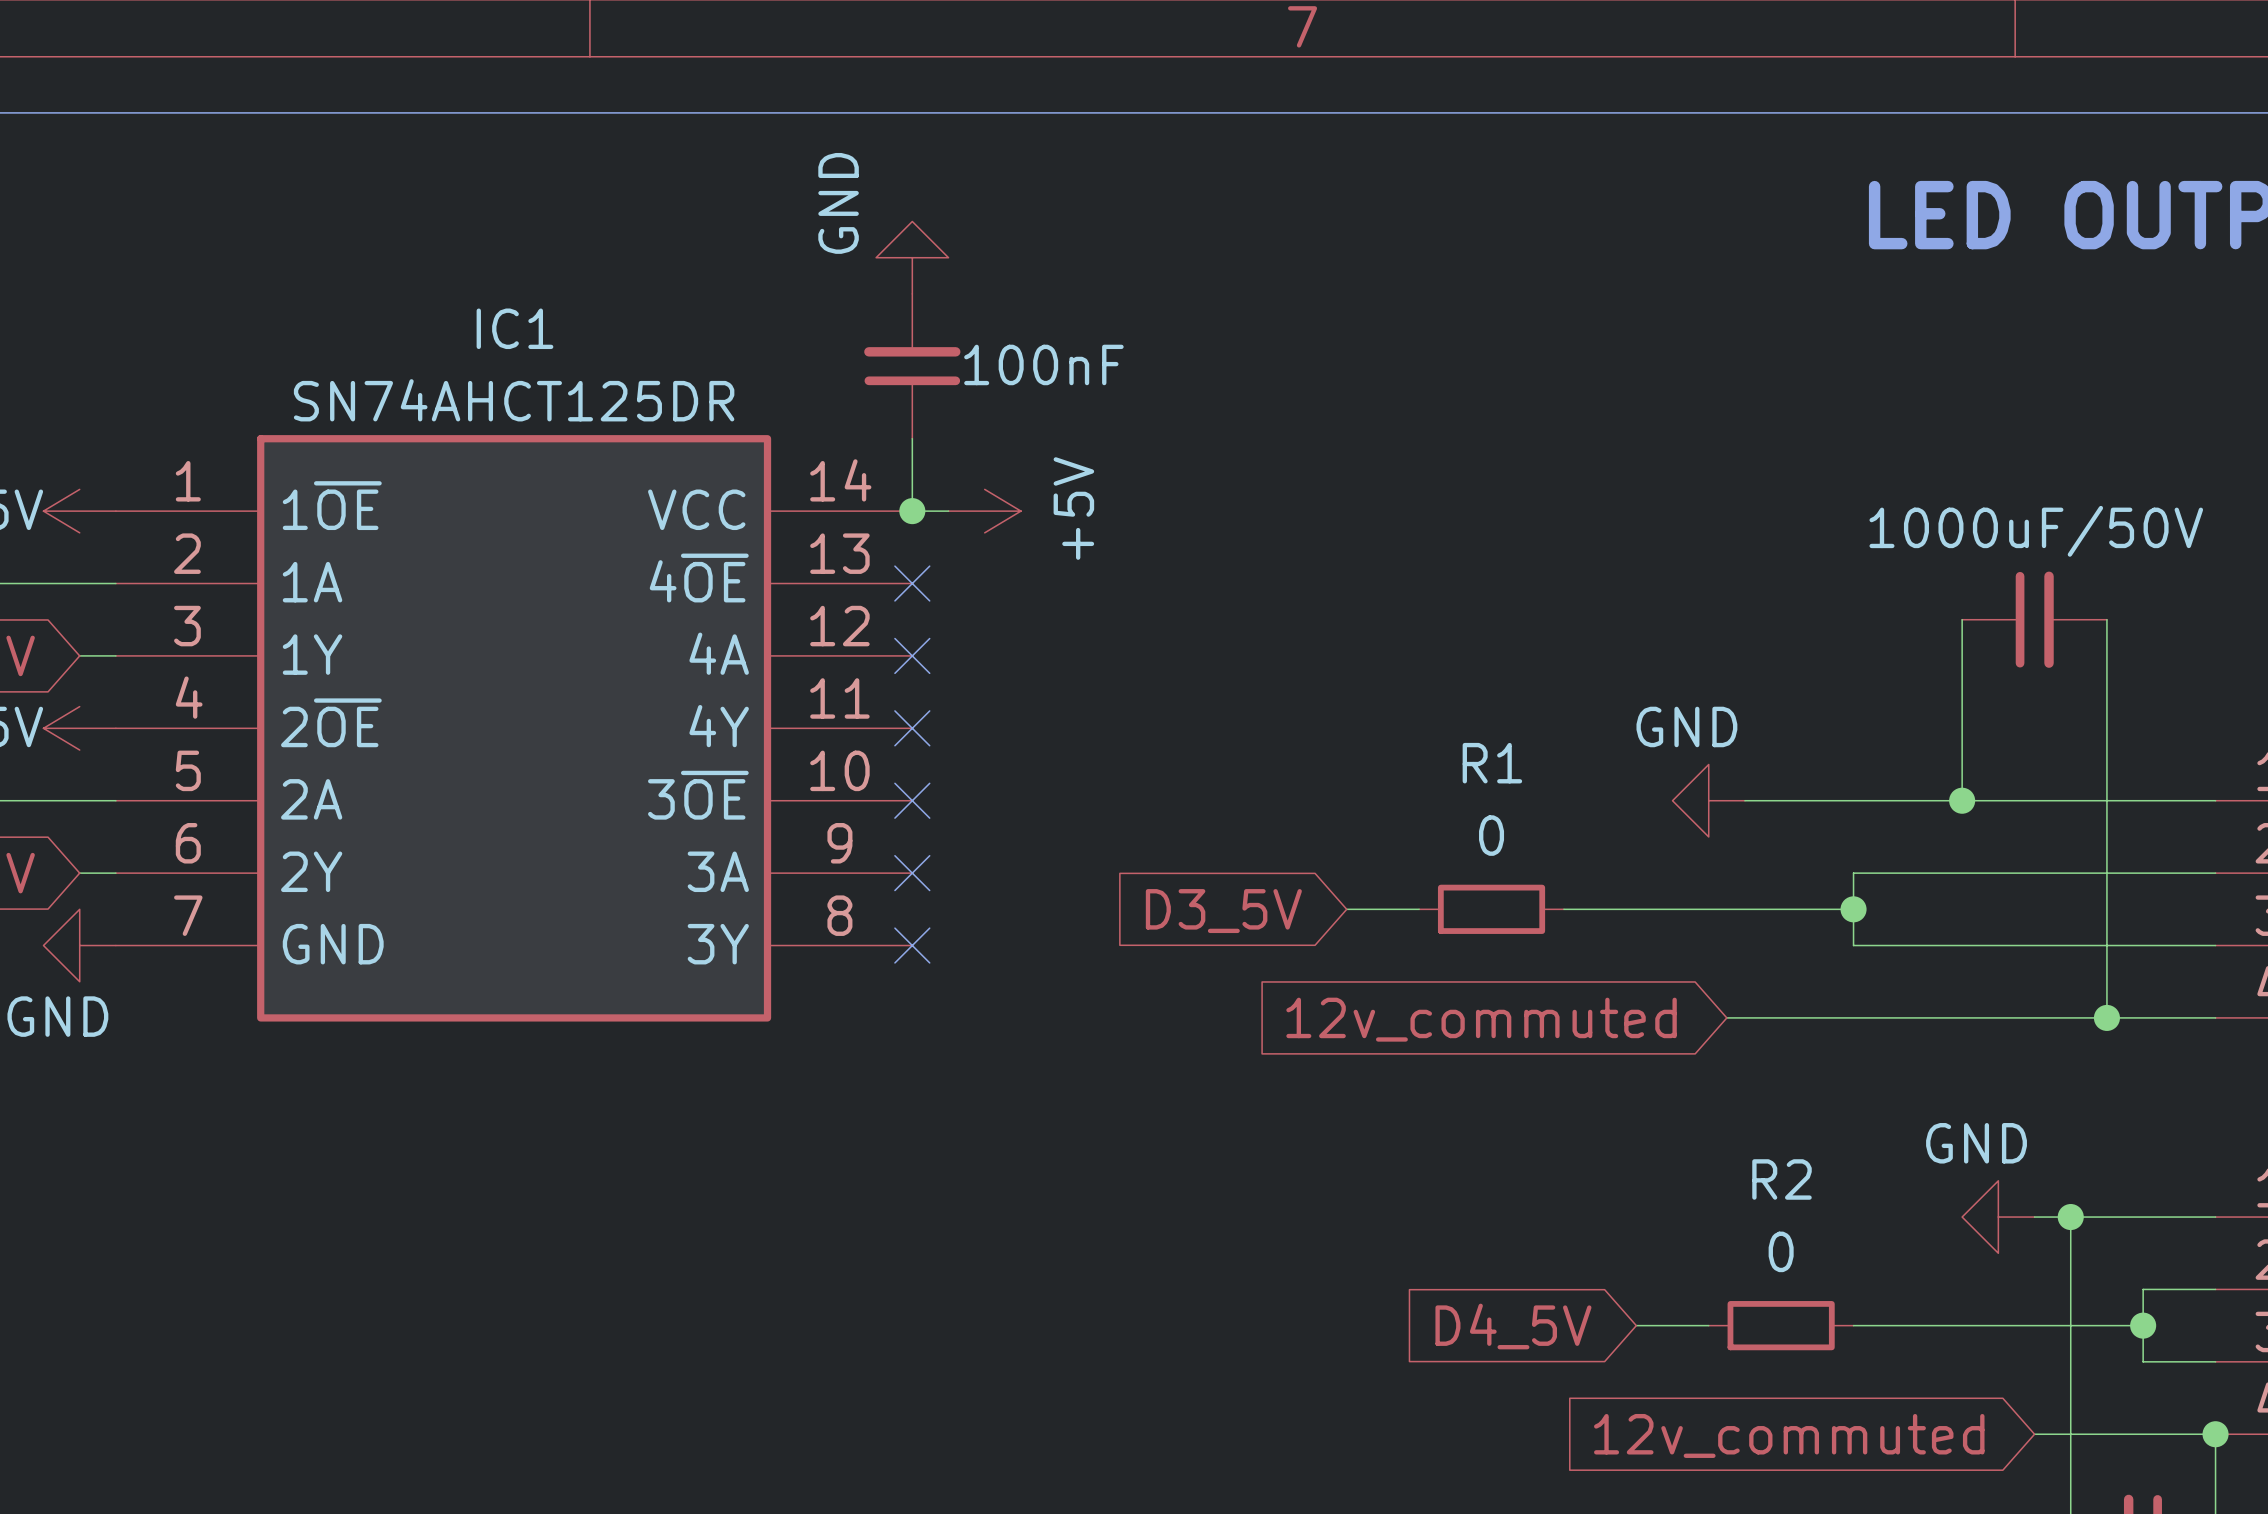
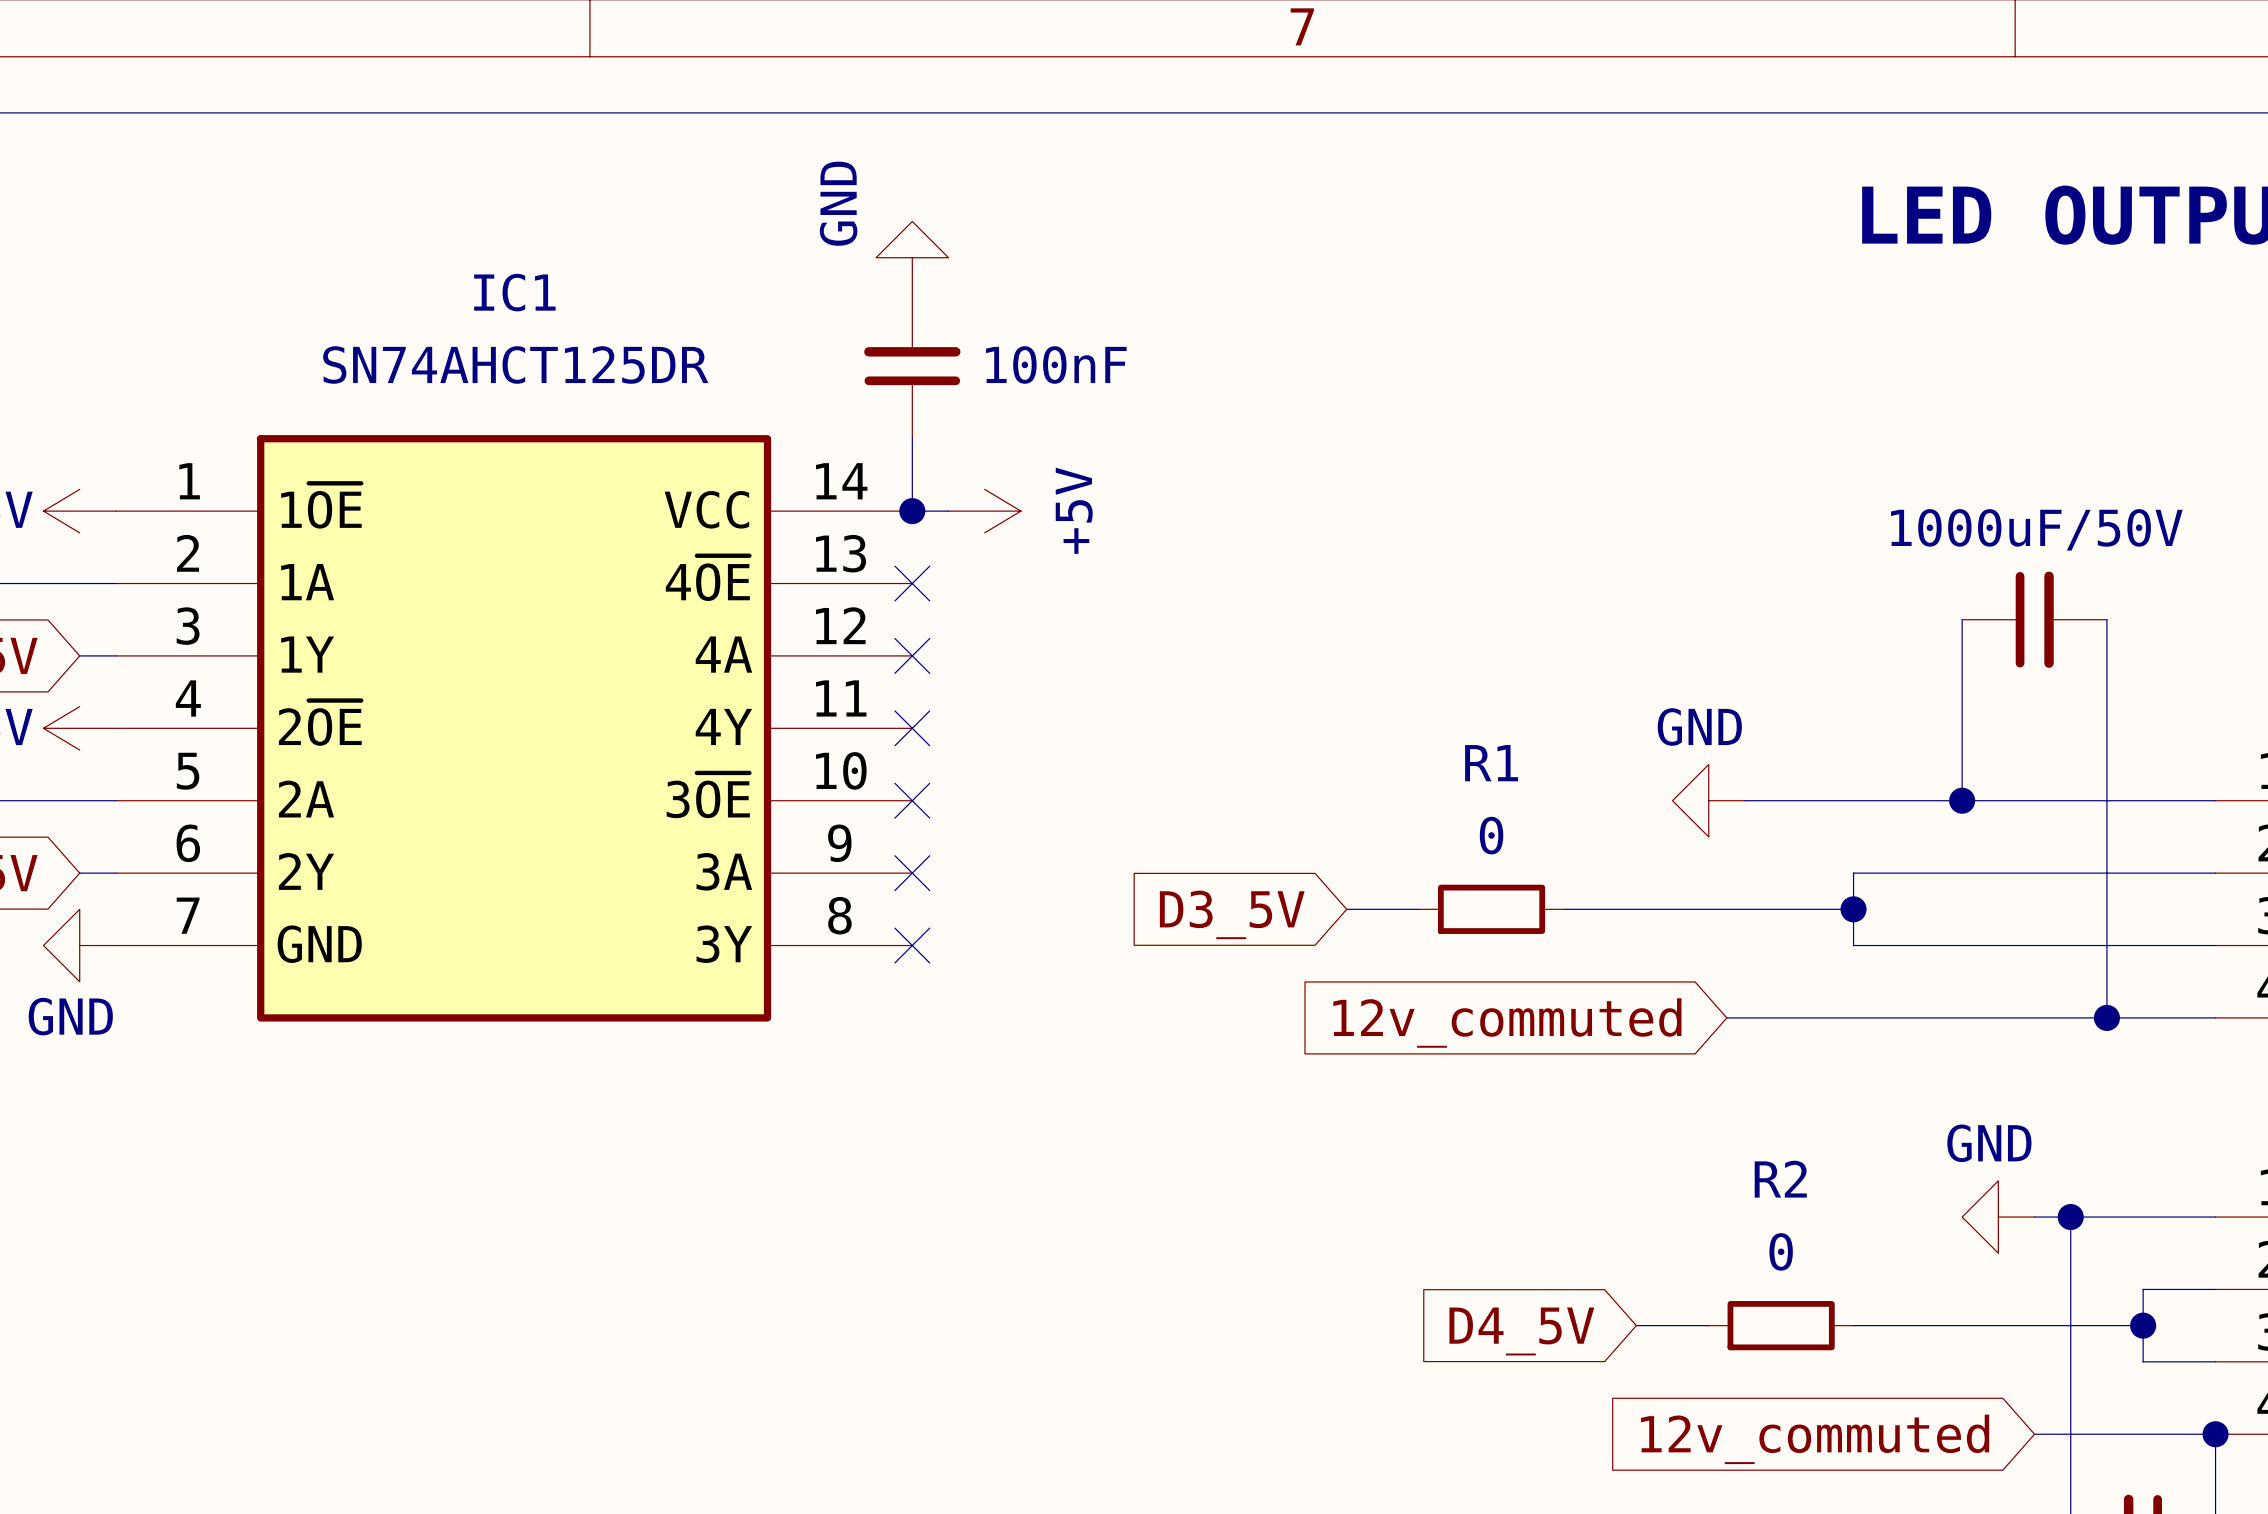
IC1 name position: IC1 (514, 328) -> IC1 (514, 292)
IC1 value position: SN74AHCT125DR (514, 400) -> SN74AHCT125DR (515, 364)

